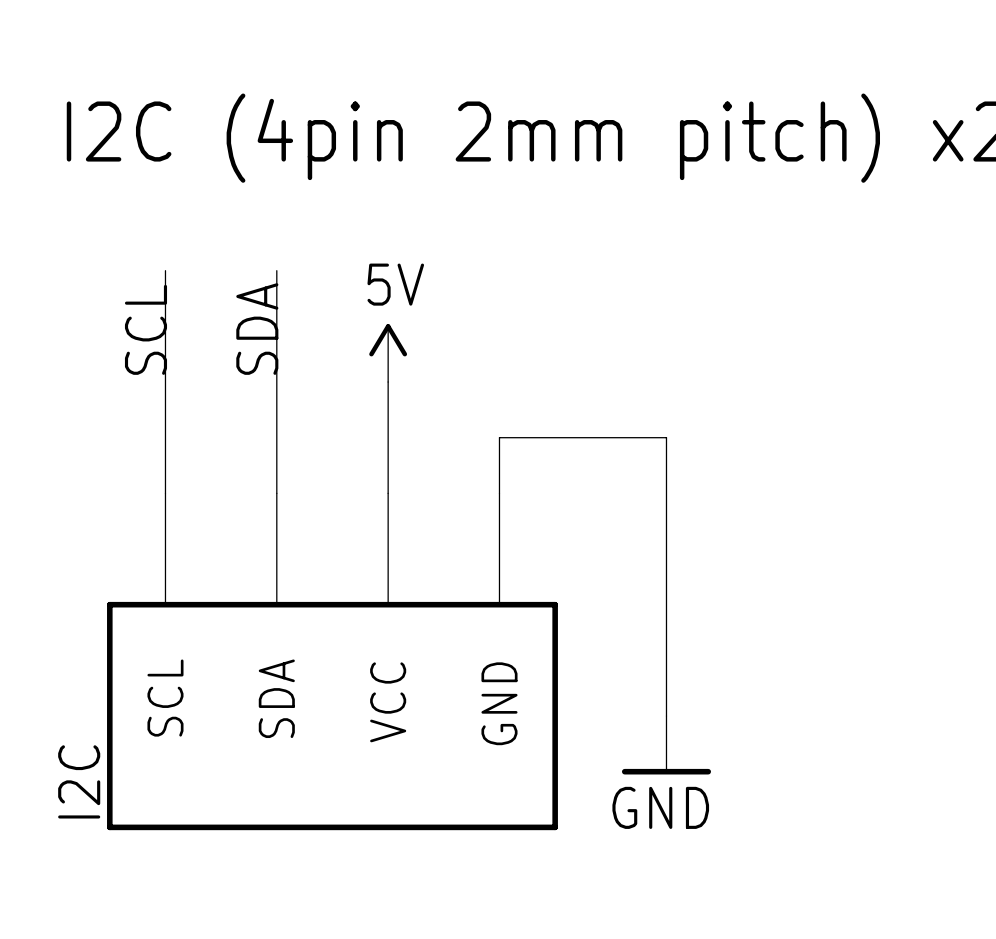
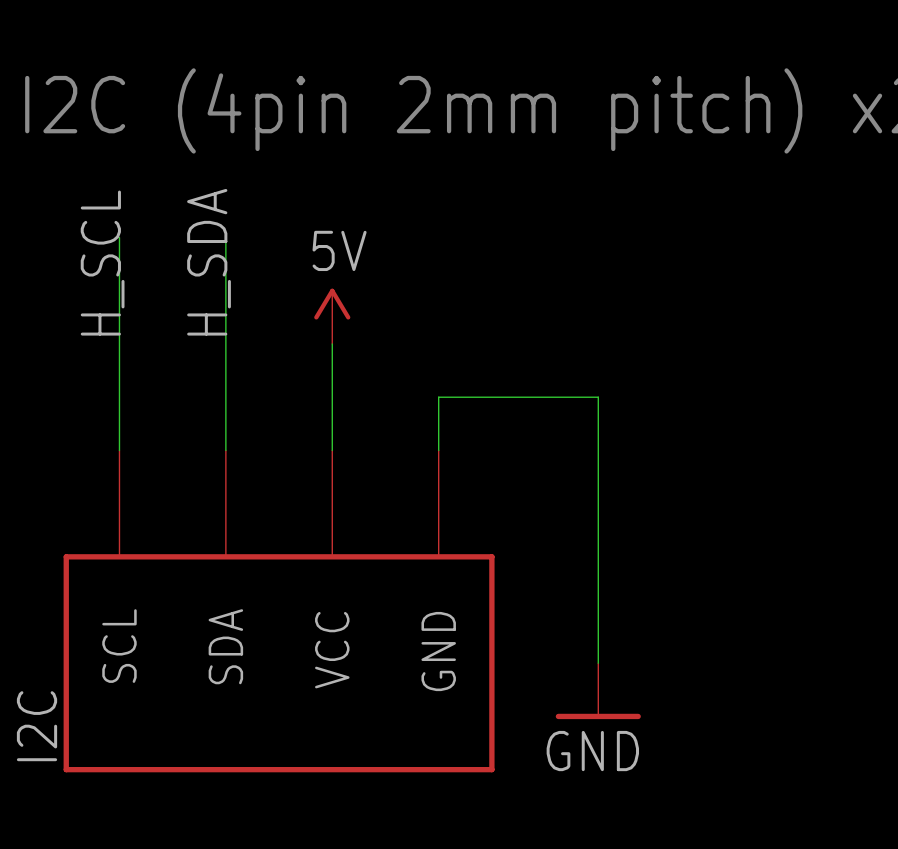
label: SCL (145, 329) -> H_SCL (102, 263)
label: SDA (257, 329) -> H_SDA (209, 262)

